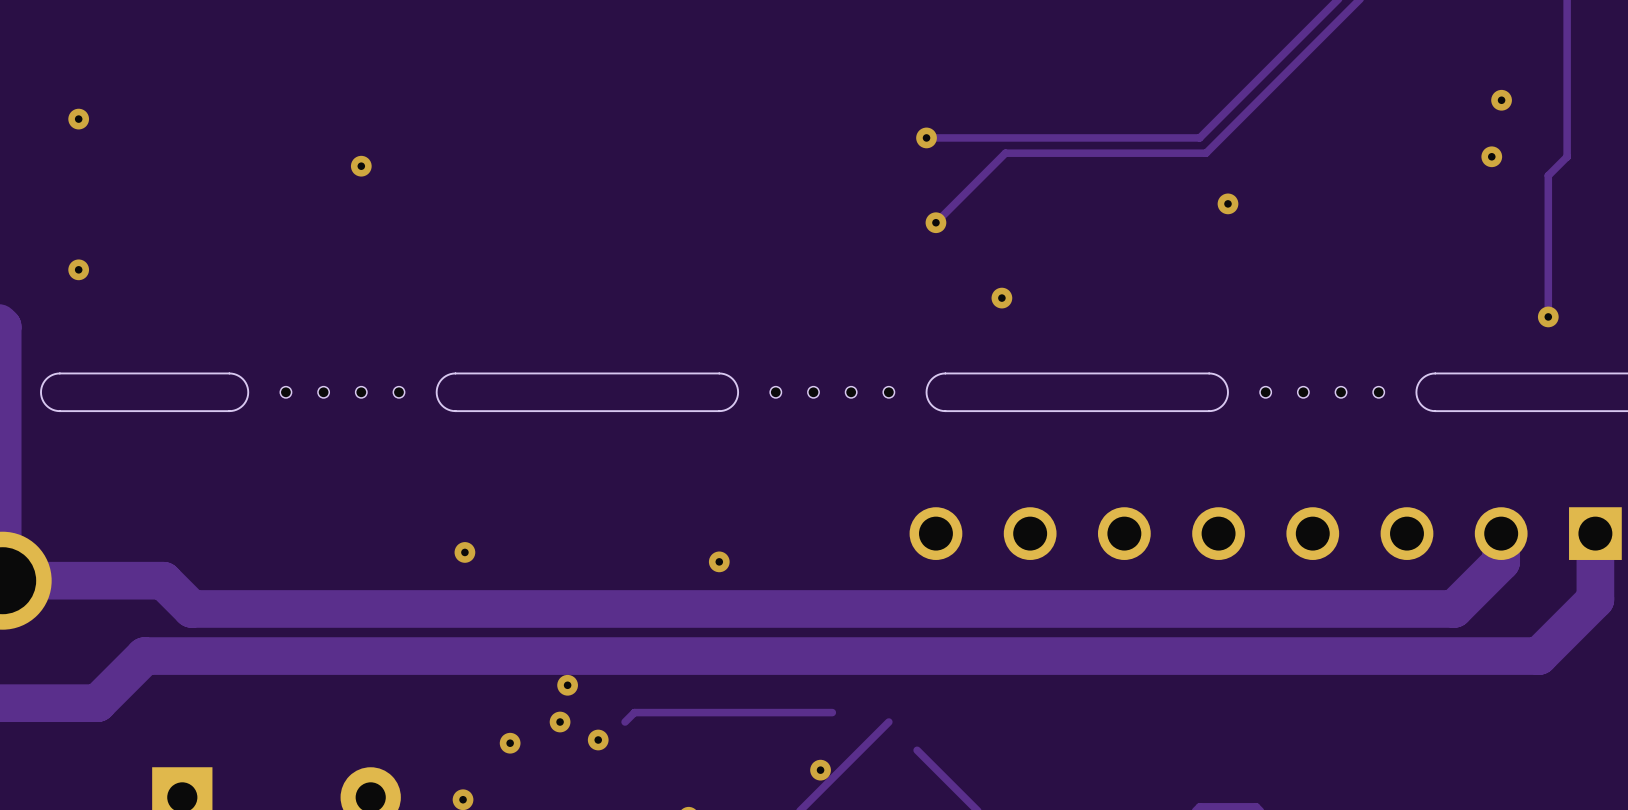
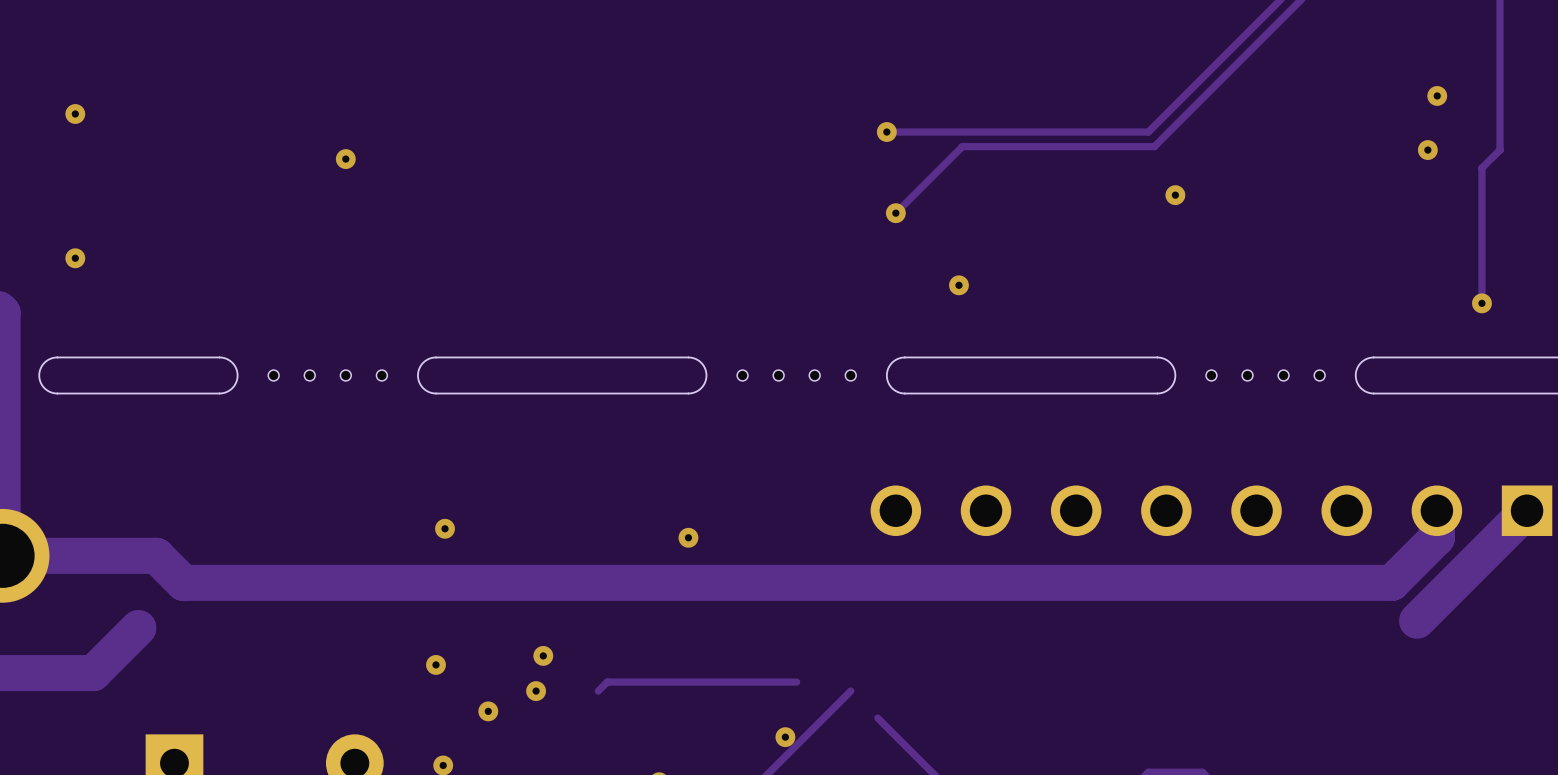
track: none -> (1527, 510) (1417, 620)
track: (1595, 543) (1595, 599) (1538, 656) (144, 656) -> none
via position: (598, 740) -> (435, 664)

